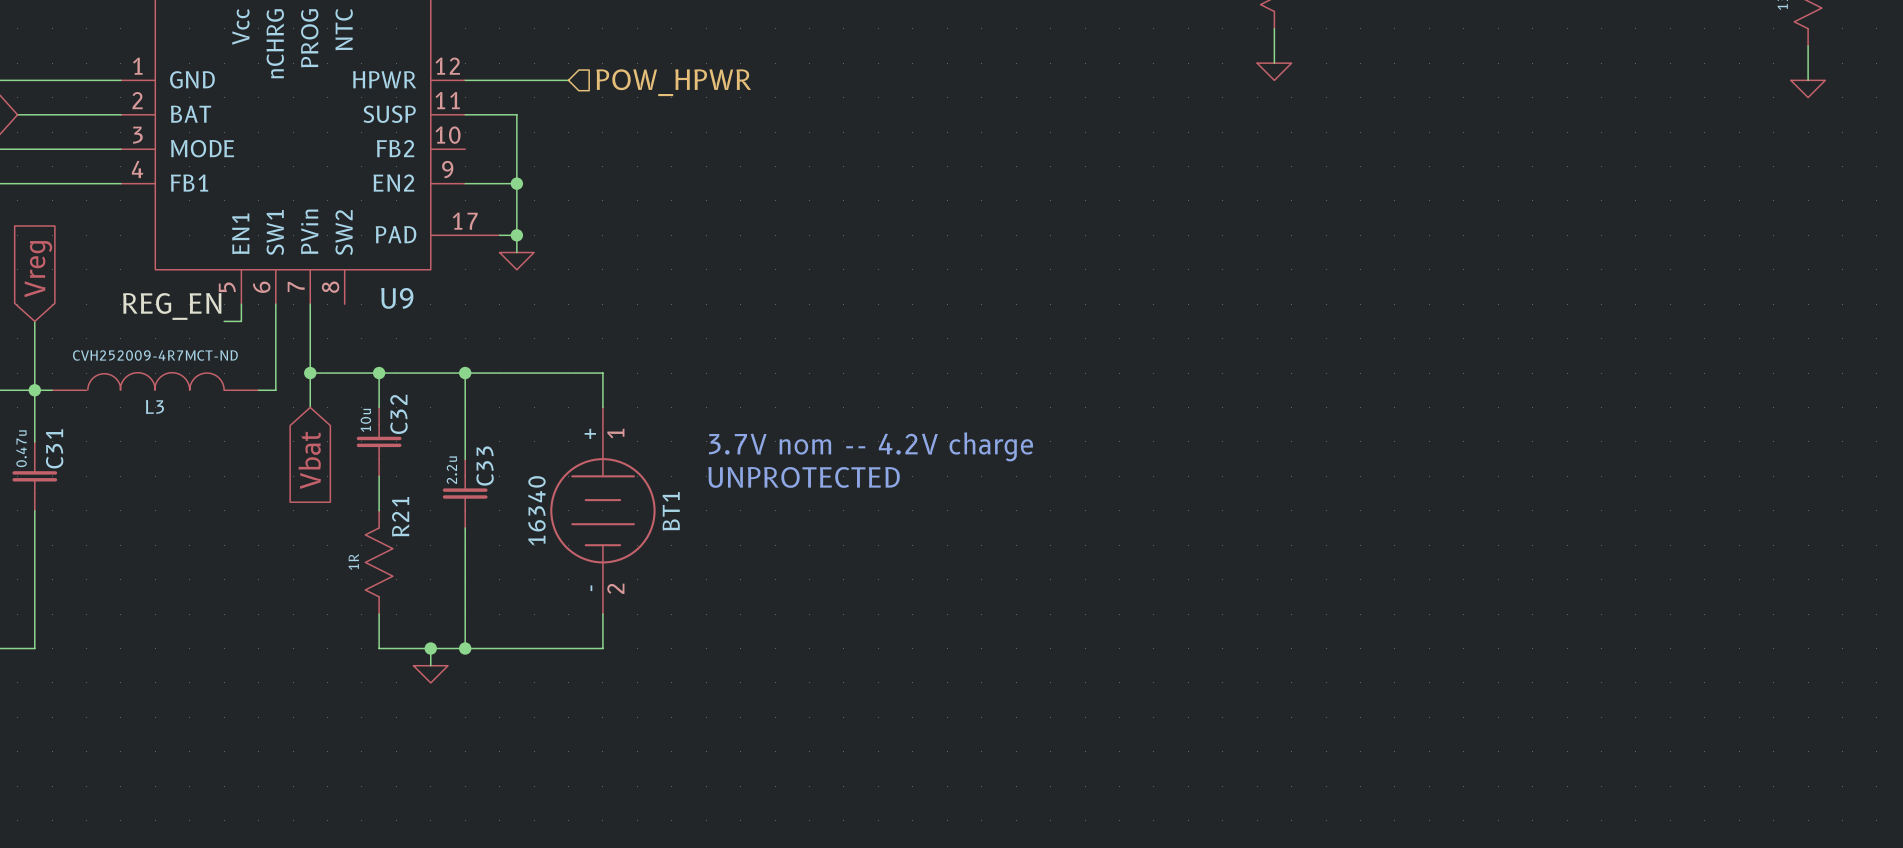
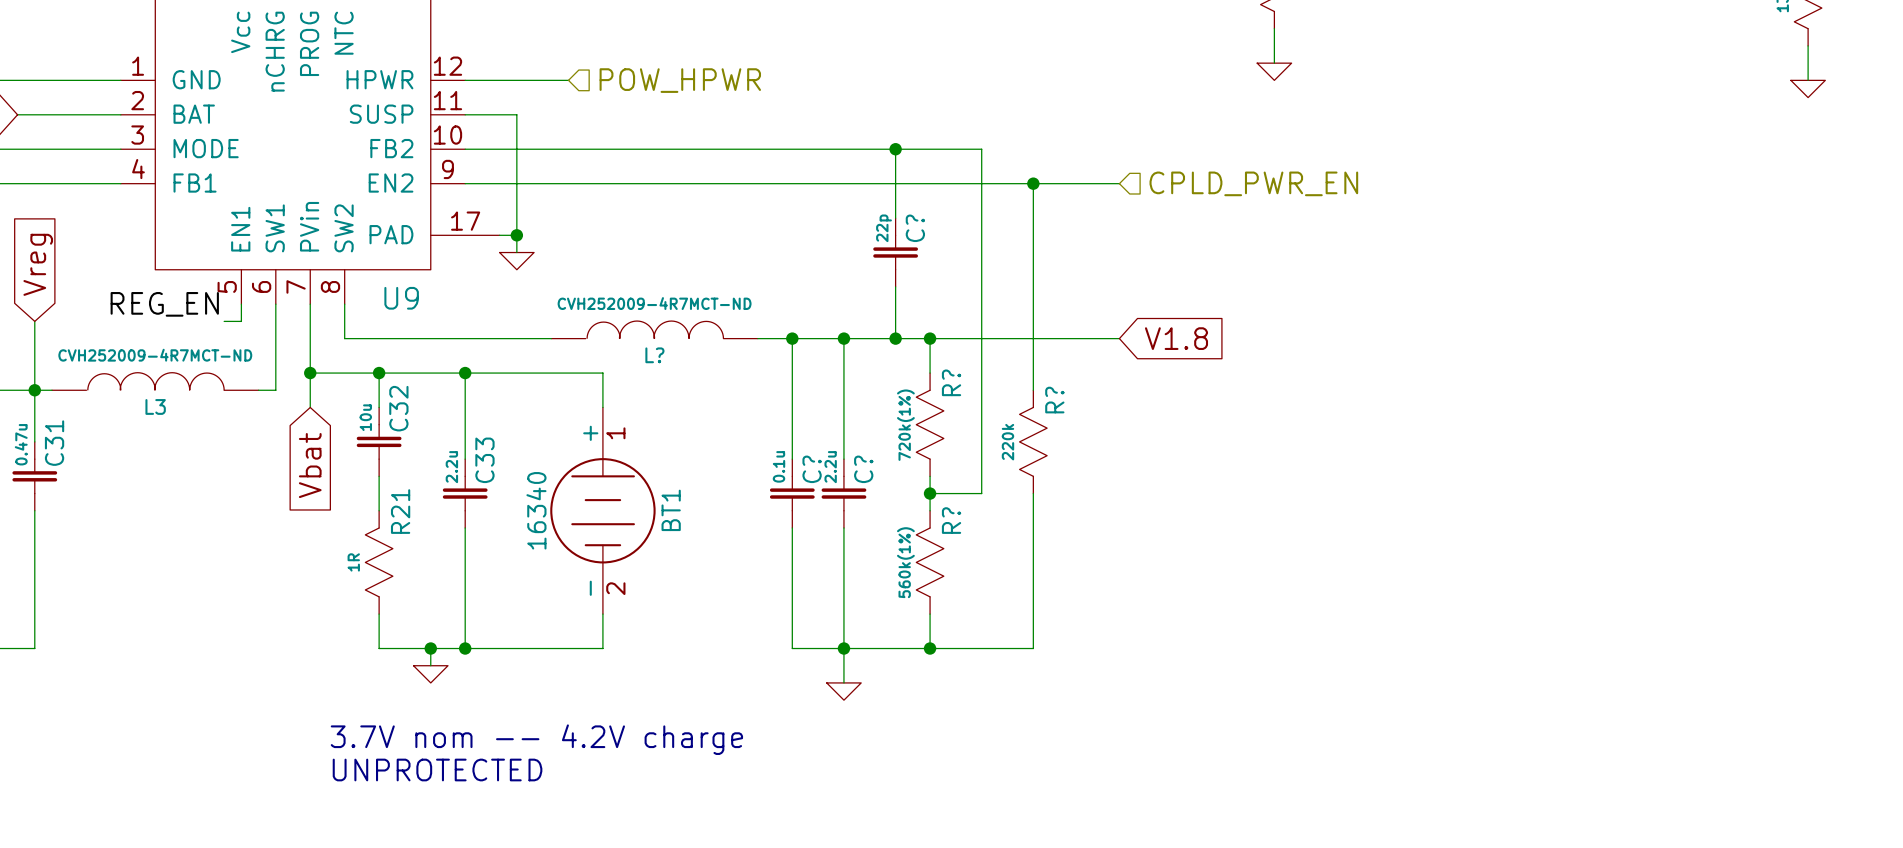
wire: none -> (465, 149) (981, 149) (981, 493) (930, 493)
wire: none -> (895, 149) (895, 218)
junction: none -> (895, 149)
wire: none -> (516, 183) (1119, 183)
junction: (516, 183) -> none
wire: none -> (1033, 183) (1033, 390)
junction: none -> (1033, 183)
hierarchical label: none -> CPLD_PWR_EN (1253, 183)
C?: none -> 22p (895, 252)
wire: none -> (895, 286) (895, 338)
wire: none -> (344, 304) (344, 338) (551, 338)
L?: none -> CVH252009-4R7MCT-ND (654, 329)
wire: none -> (757, 338) (1119, 338)
wire: none -> (792, 338) (792, 459)
junction: none -> (792, 338)
wire: none -> (843, 338) (843, 459)
junction: none -> (843, 338)
junction: none -> (895, 338)
wire: none -> (930, 338) (930, 373)
junction: none -> (930, 338)
global label: none -> V1.8 (1176, 338)
R?: none -> 720k(1%) (930, 424)
R?: none -> 220k (1033, 441)
text: 3.7V nom -- 4.2V charge (870, 446) -> none
wire: none -> (930, 476) (930, 510)
text: UNPROTECTED (804, 477) -> none
C?: none -> 0.1u (792, 493)
C?: none -> 2.2u (843, 493)
junction: none -> (930, 493)
wire: none -> (1033, 493) (1033, 648) (792, 648) (792, 528)
wire: none -> (843, 528) (843, 682)
R?: none -> 560k(1%) (930, 562)
wire: none -> (930, 614) (930, 648)
junction: none -> (843, 648)
junction: none -> (930, 648)
power symbol: none -> (843, 691)
text: none -> 3.7V nom -- 4.2V charge (536, 739)
text: none -> UNPROTECTED (437, 770)

